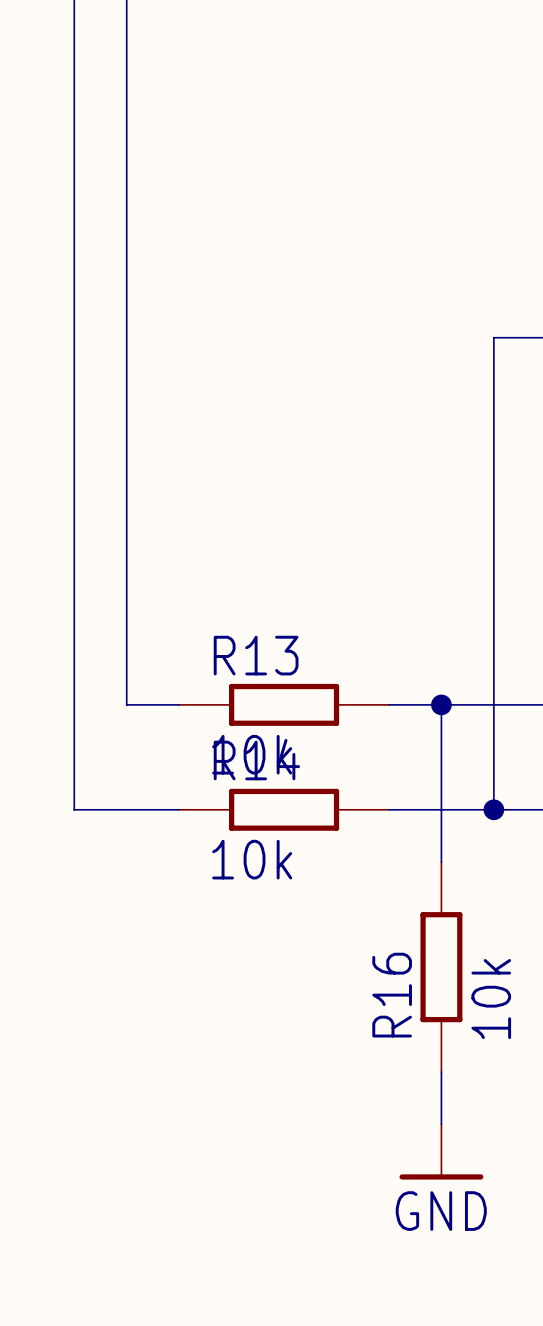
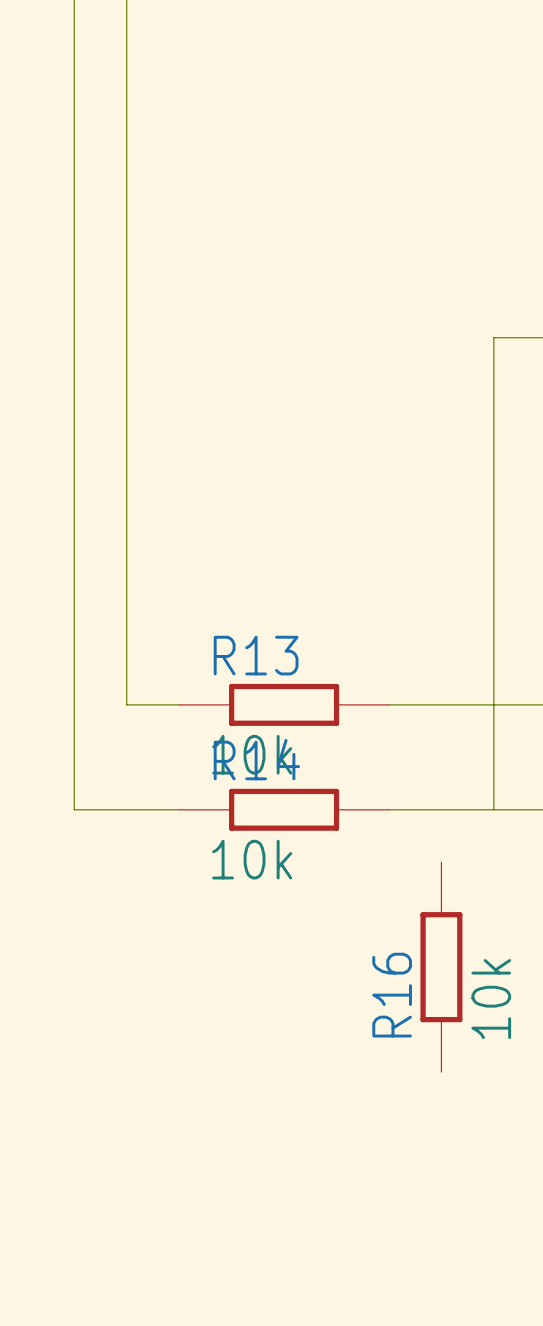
wire: (441, 704) (441, 862) -> none
junction: (441, 704) -> none
junction: (493, 809) -> none
wire: (441, 1072) (441, 1124) -> none
power symbol: GND (441, 1152) -> none

